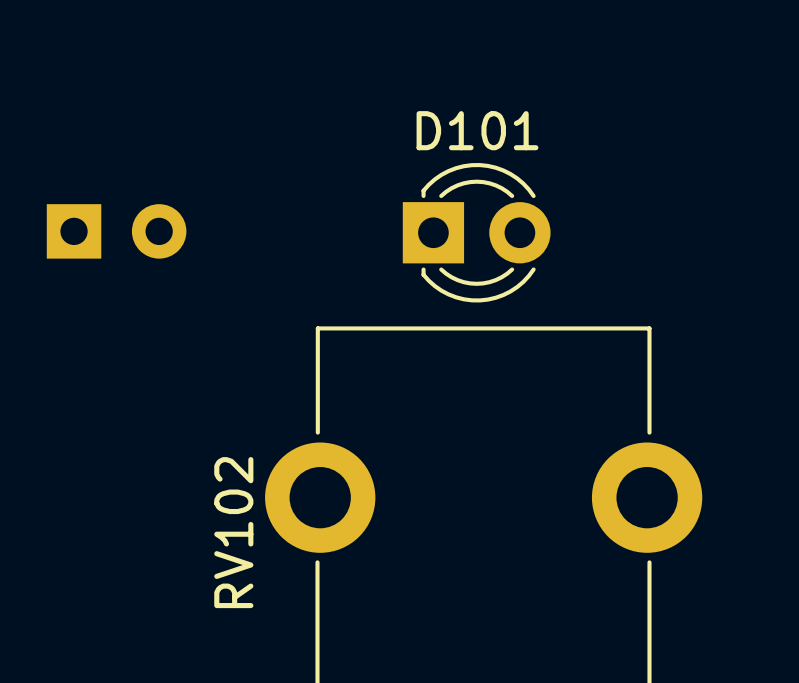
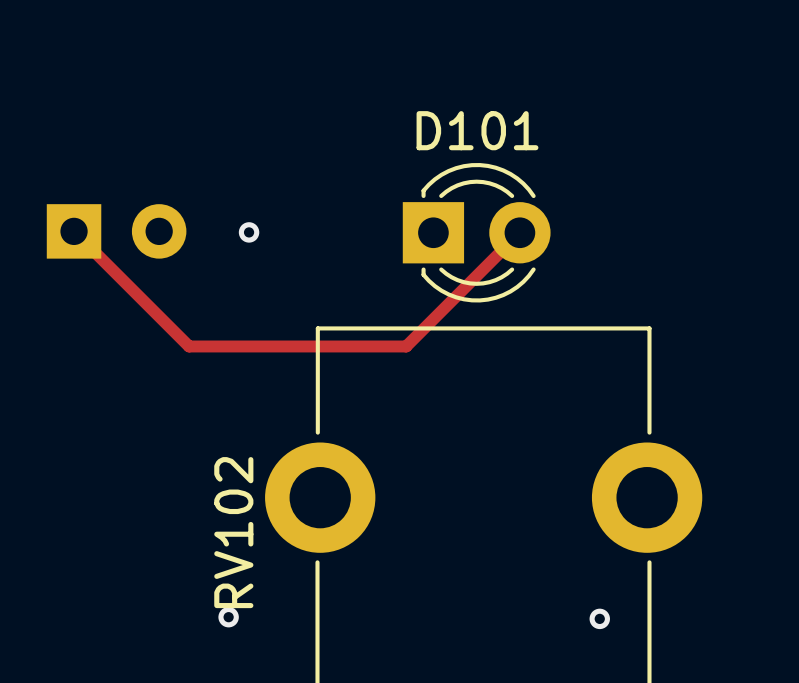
track: none -> (74, 231) (189, 346) (406, 346) (519, 232)
via: none -> (249, 232)
via: none -> (228, 617)
via: none -> (599, 618)

